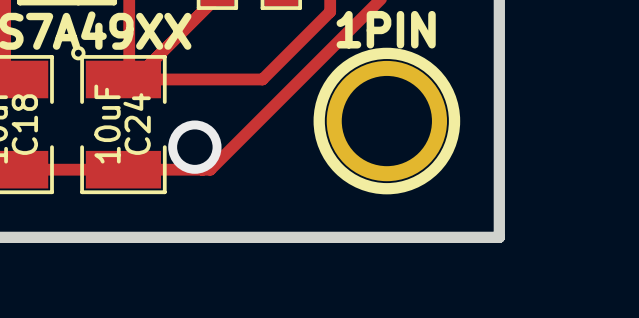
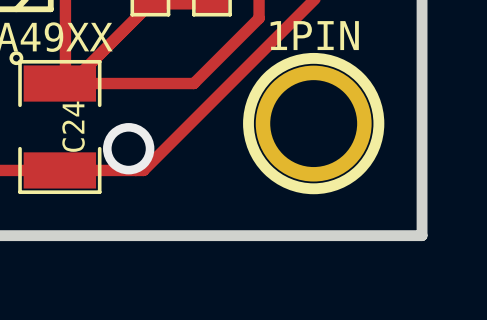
C24 value: 10uF (107, 124) -> none

